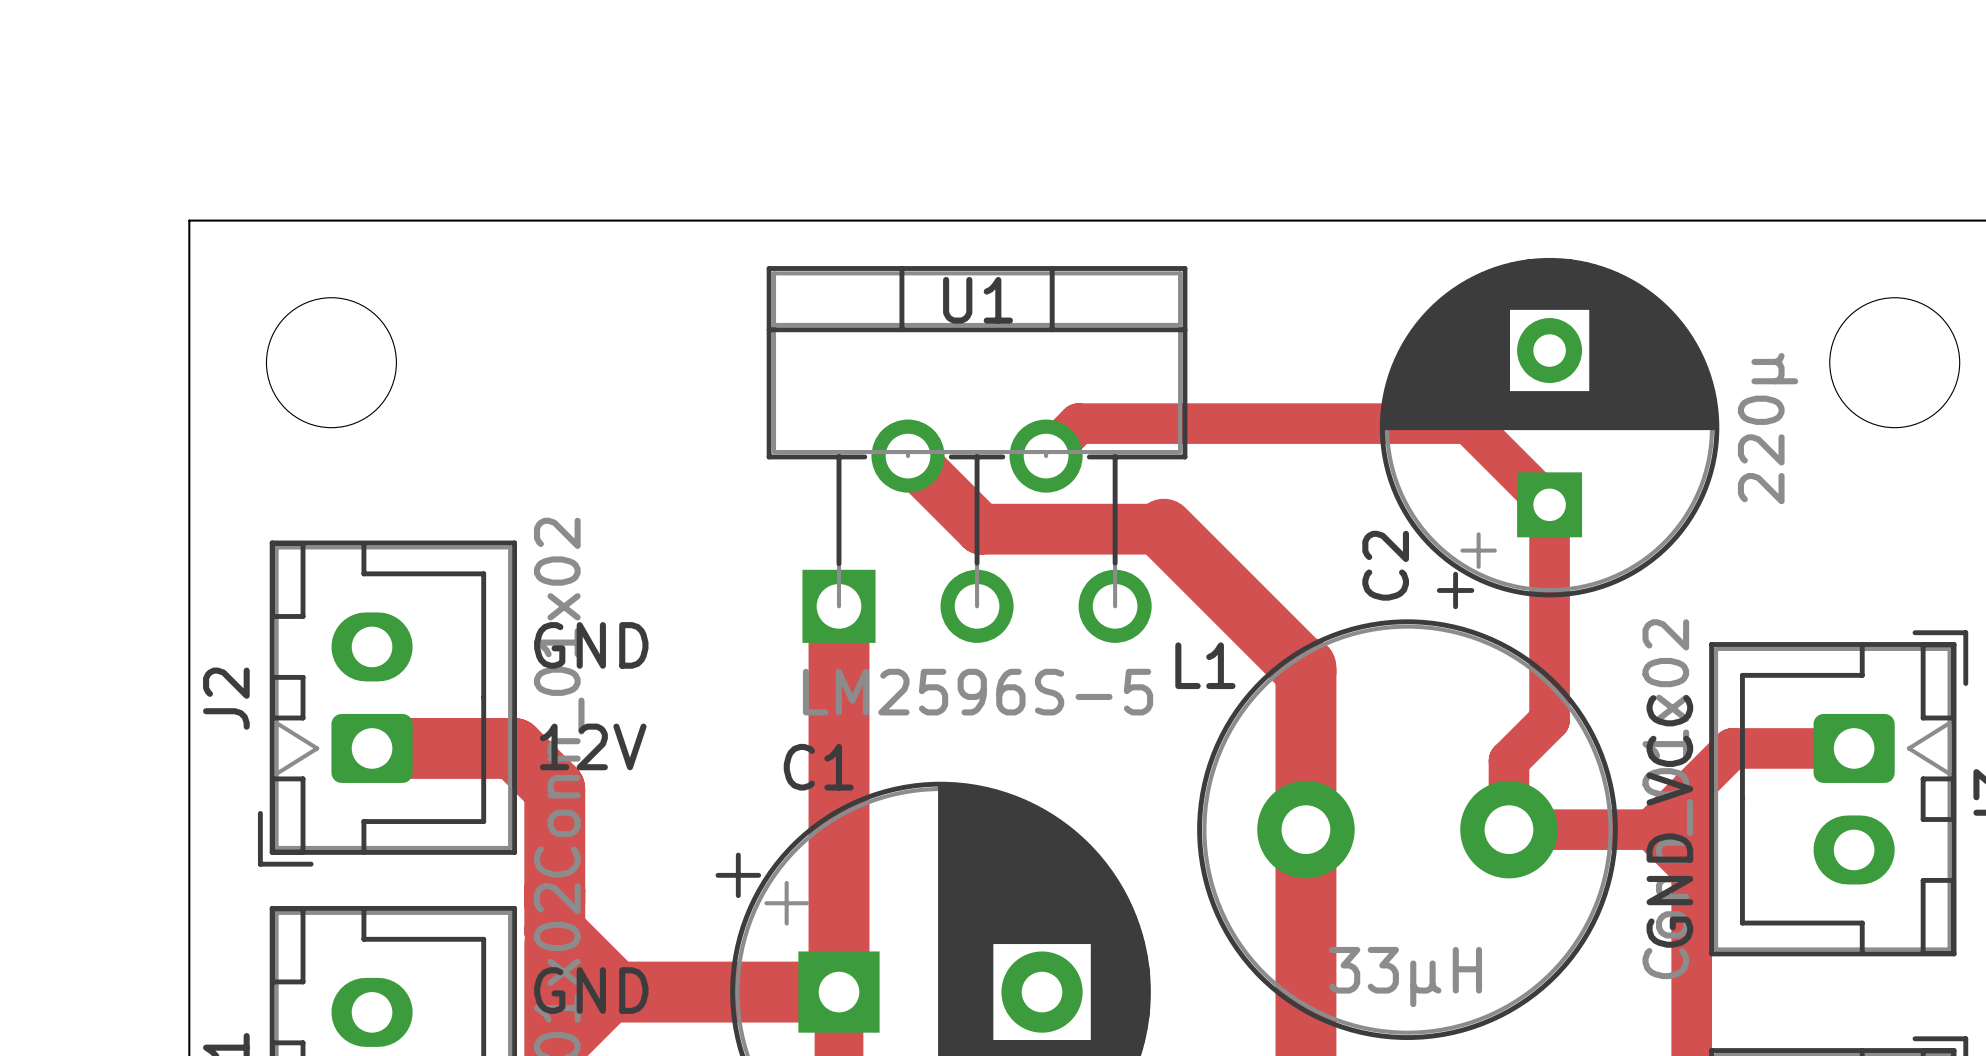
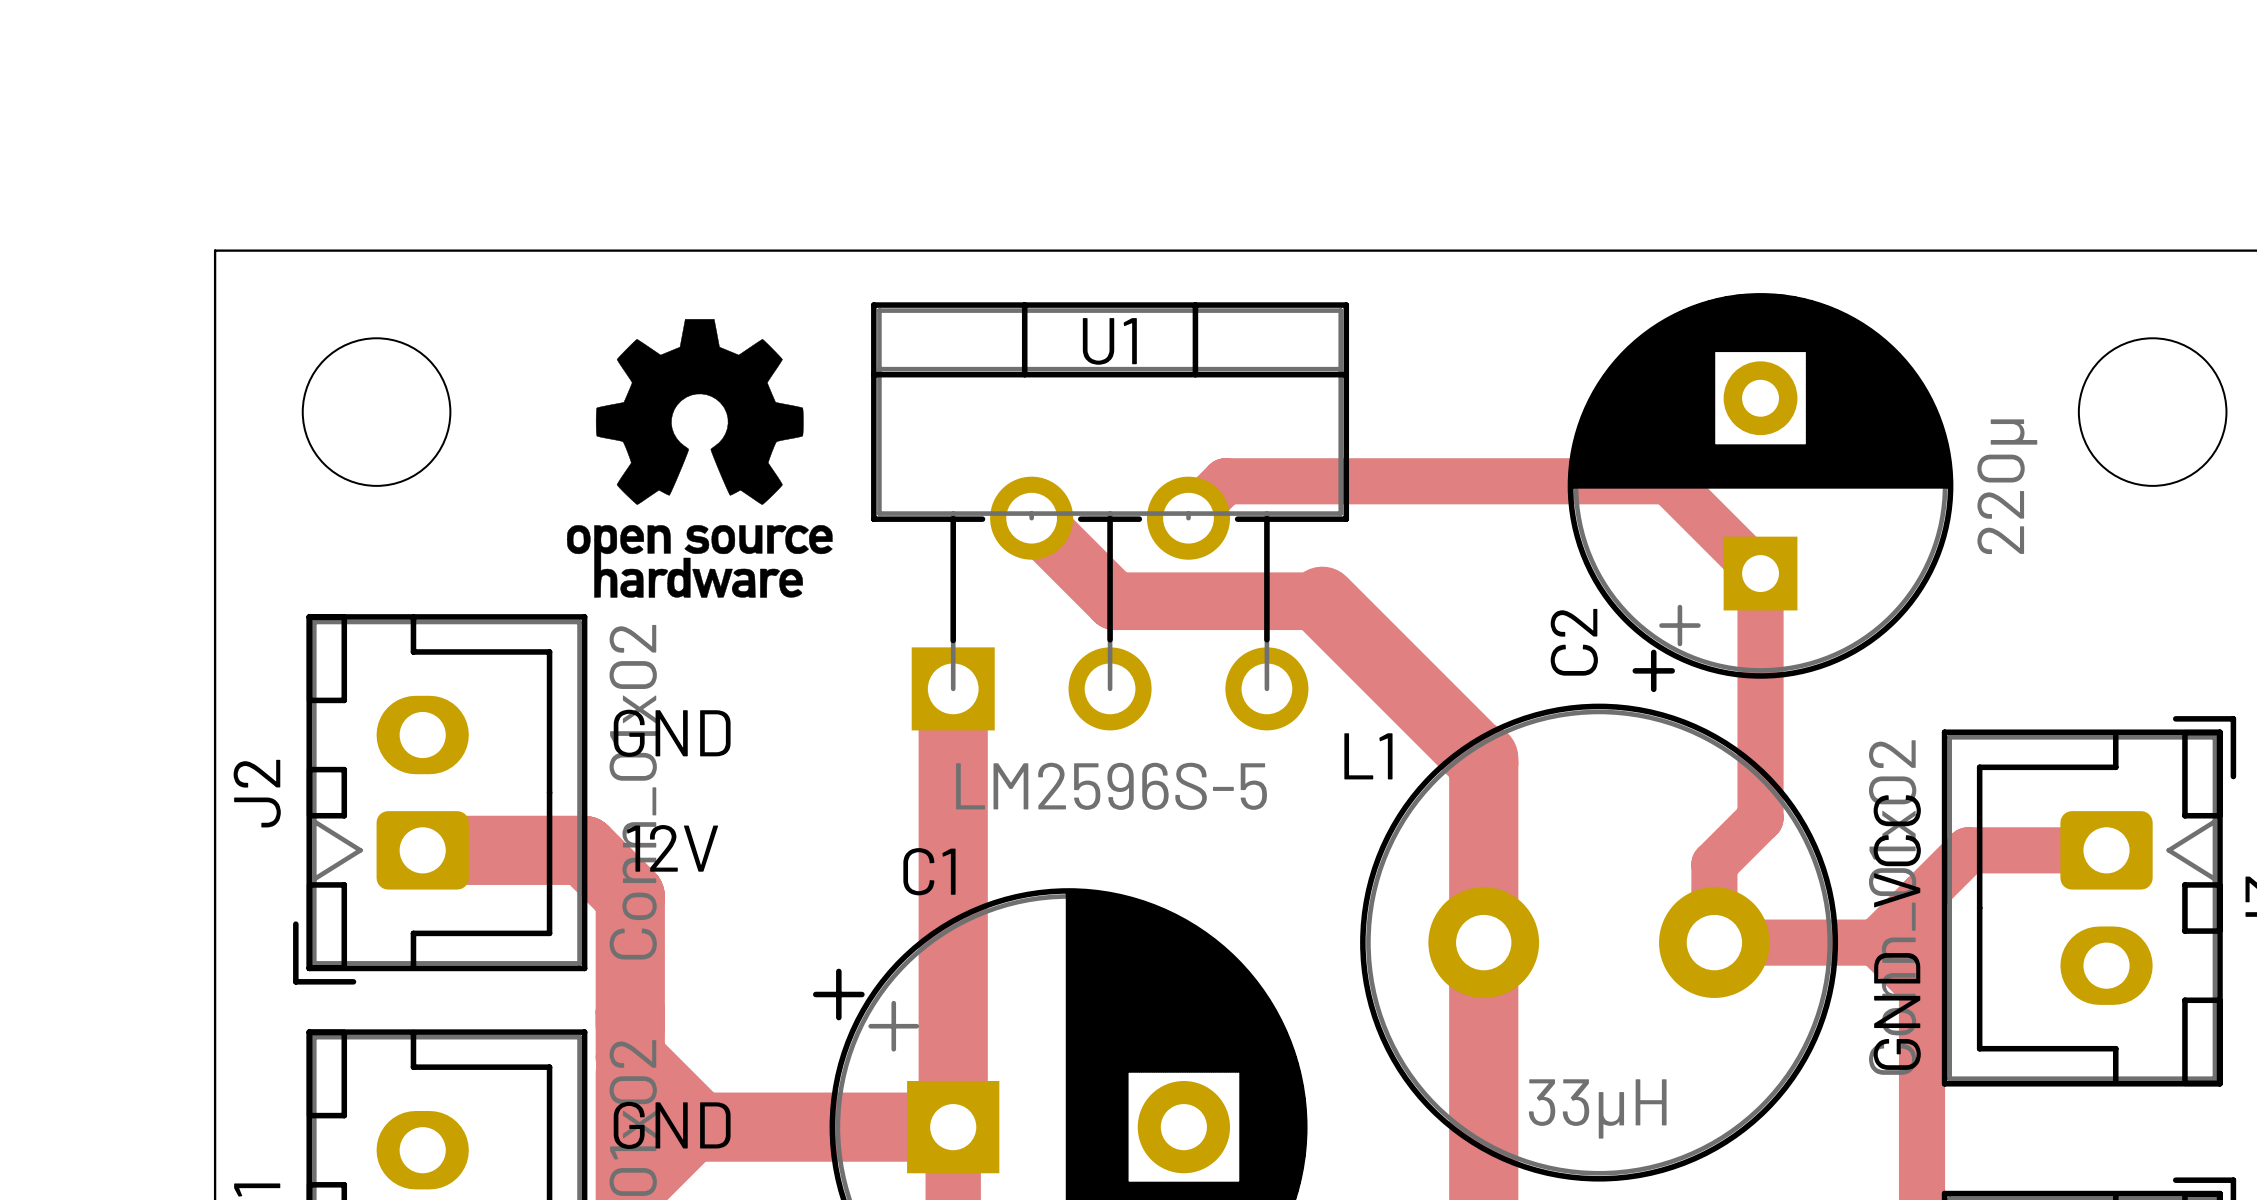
drawing: none -> [567, 319, 833, 598]

